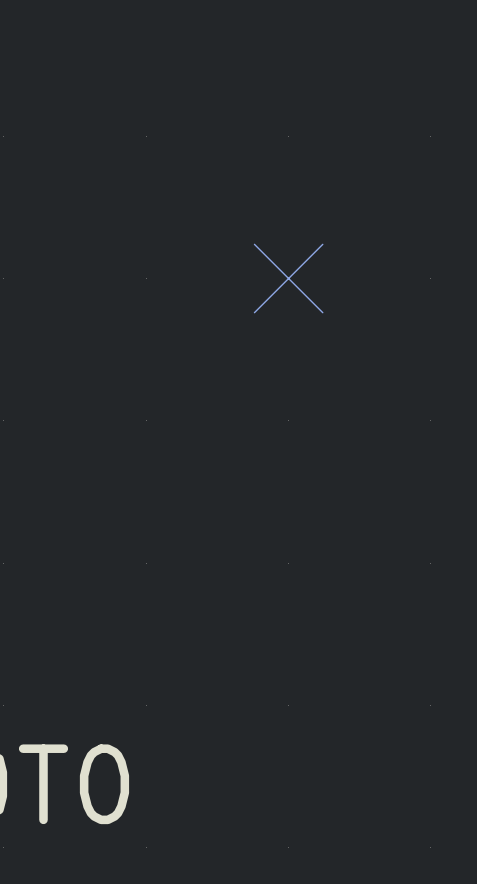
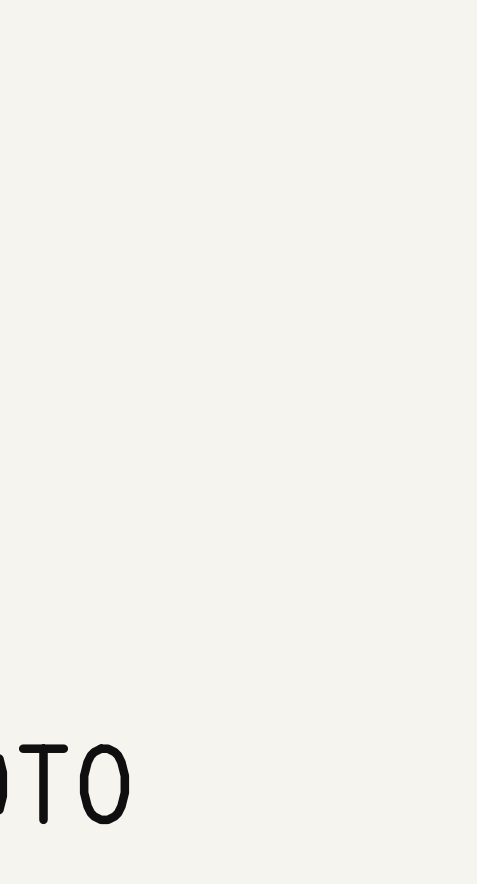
no-connect mark: (288, 278) -> none

